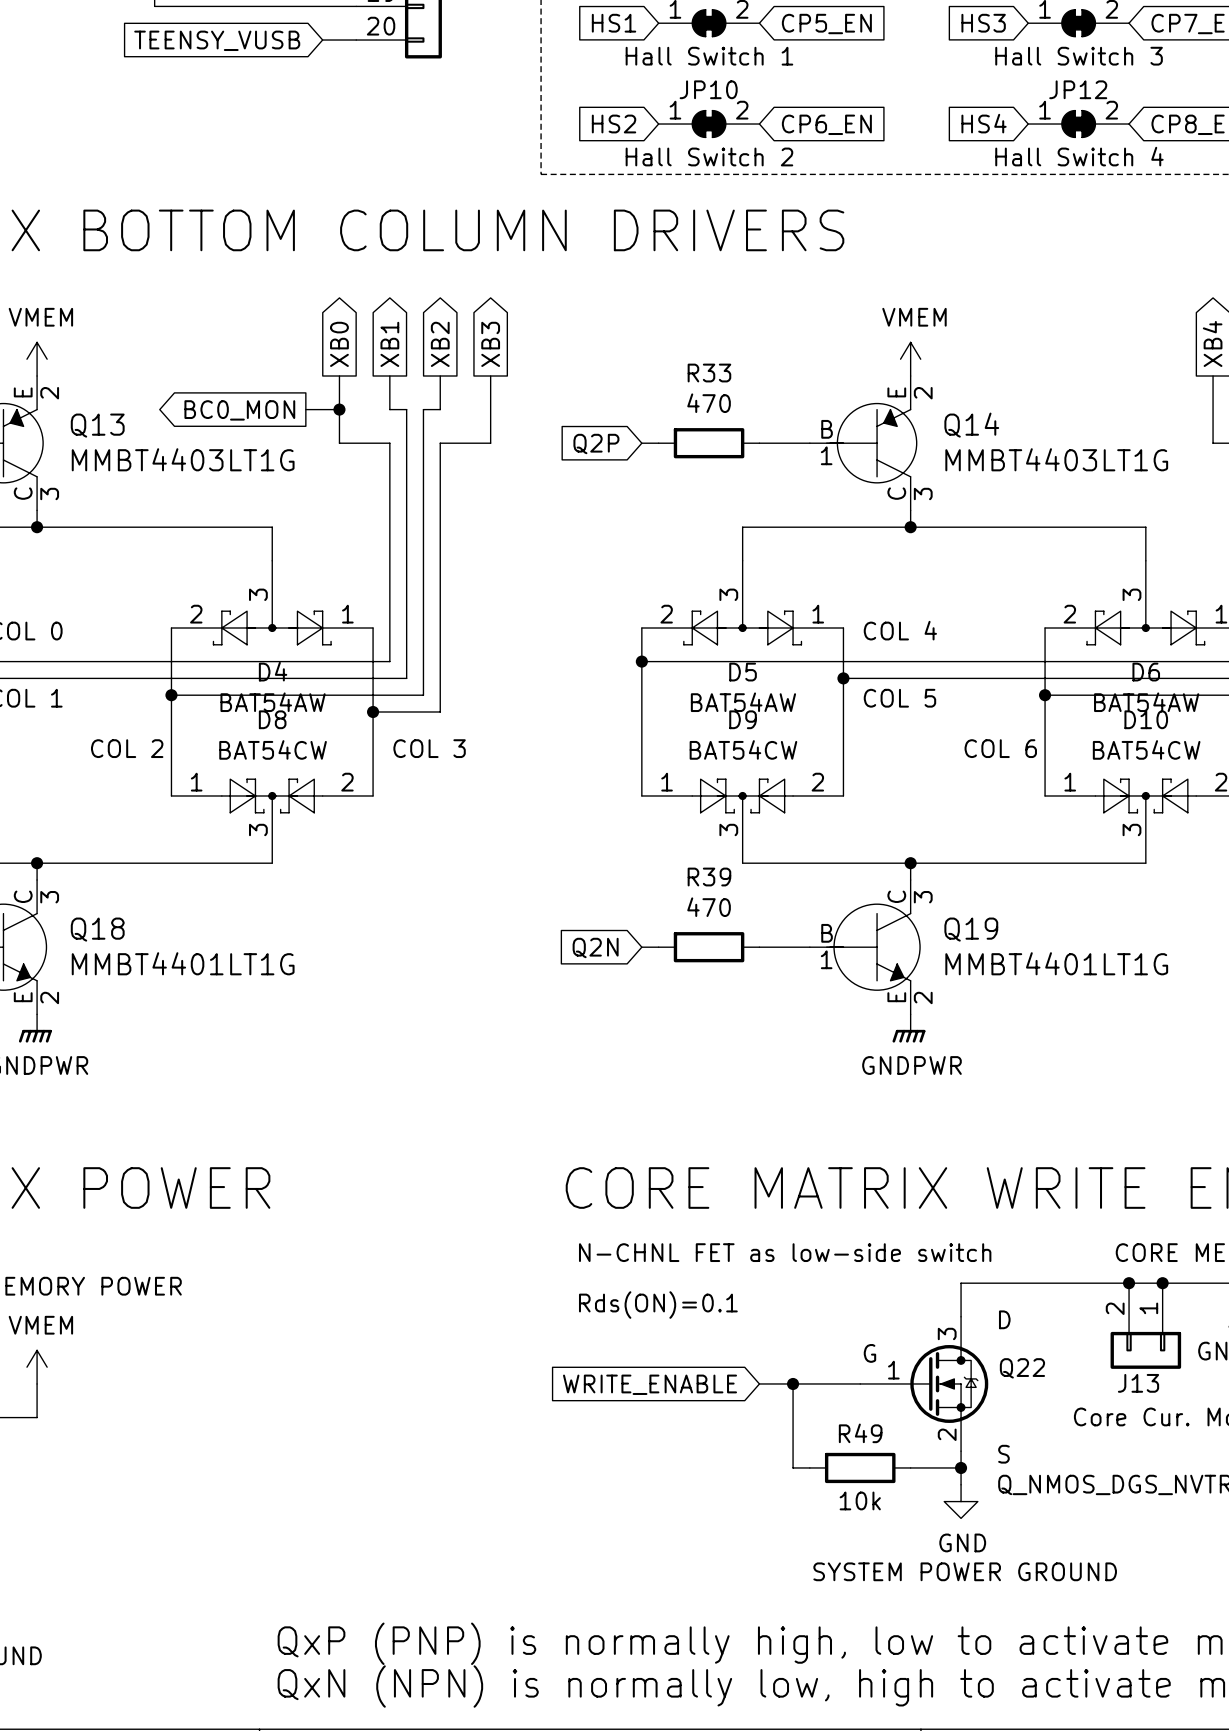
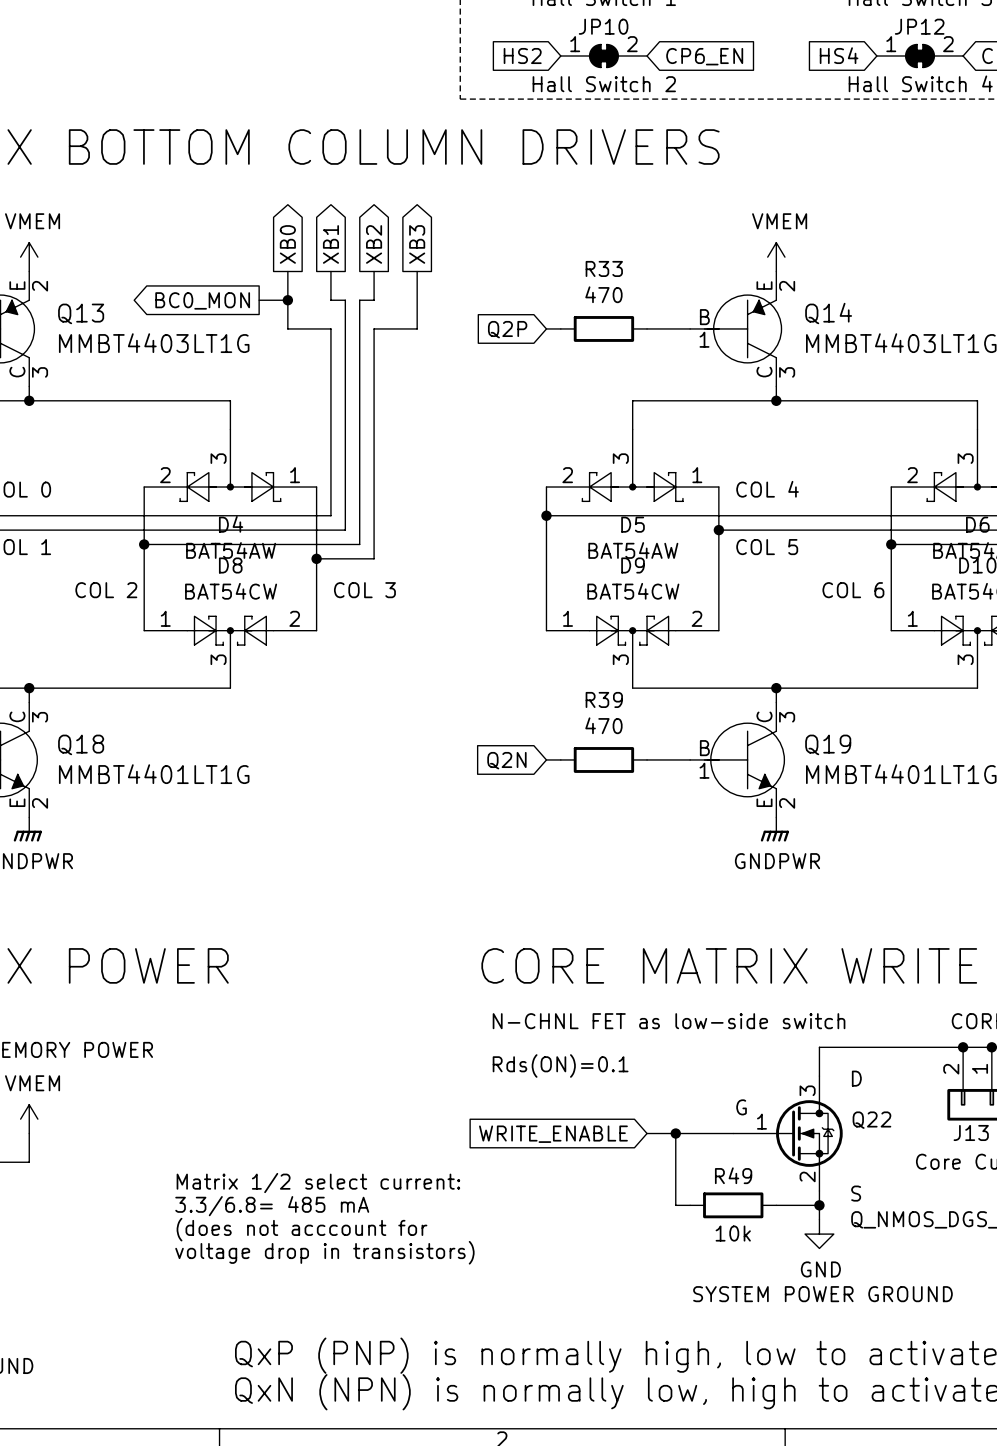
text: none -> Matrix 1/2 select current: (318, 1183)
text: none -> 3.3/6.8= 485 mA (272, 1206)
text: none -> (does not acccount for (301, 1229)
text: none -> voltage drop in transistors) (324, 1252)

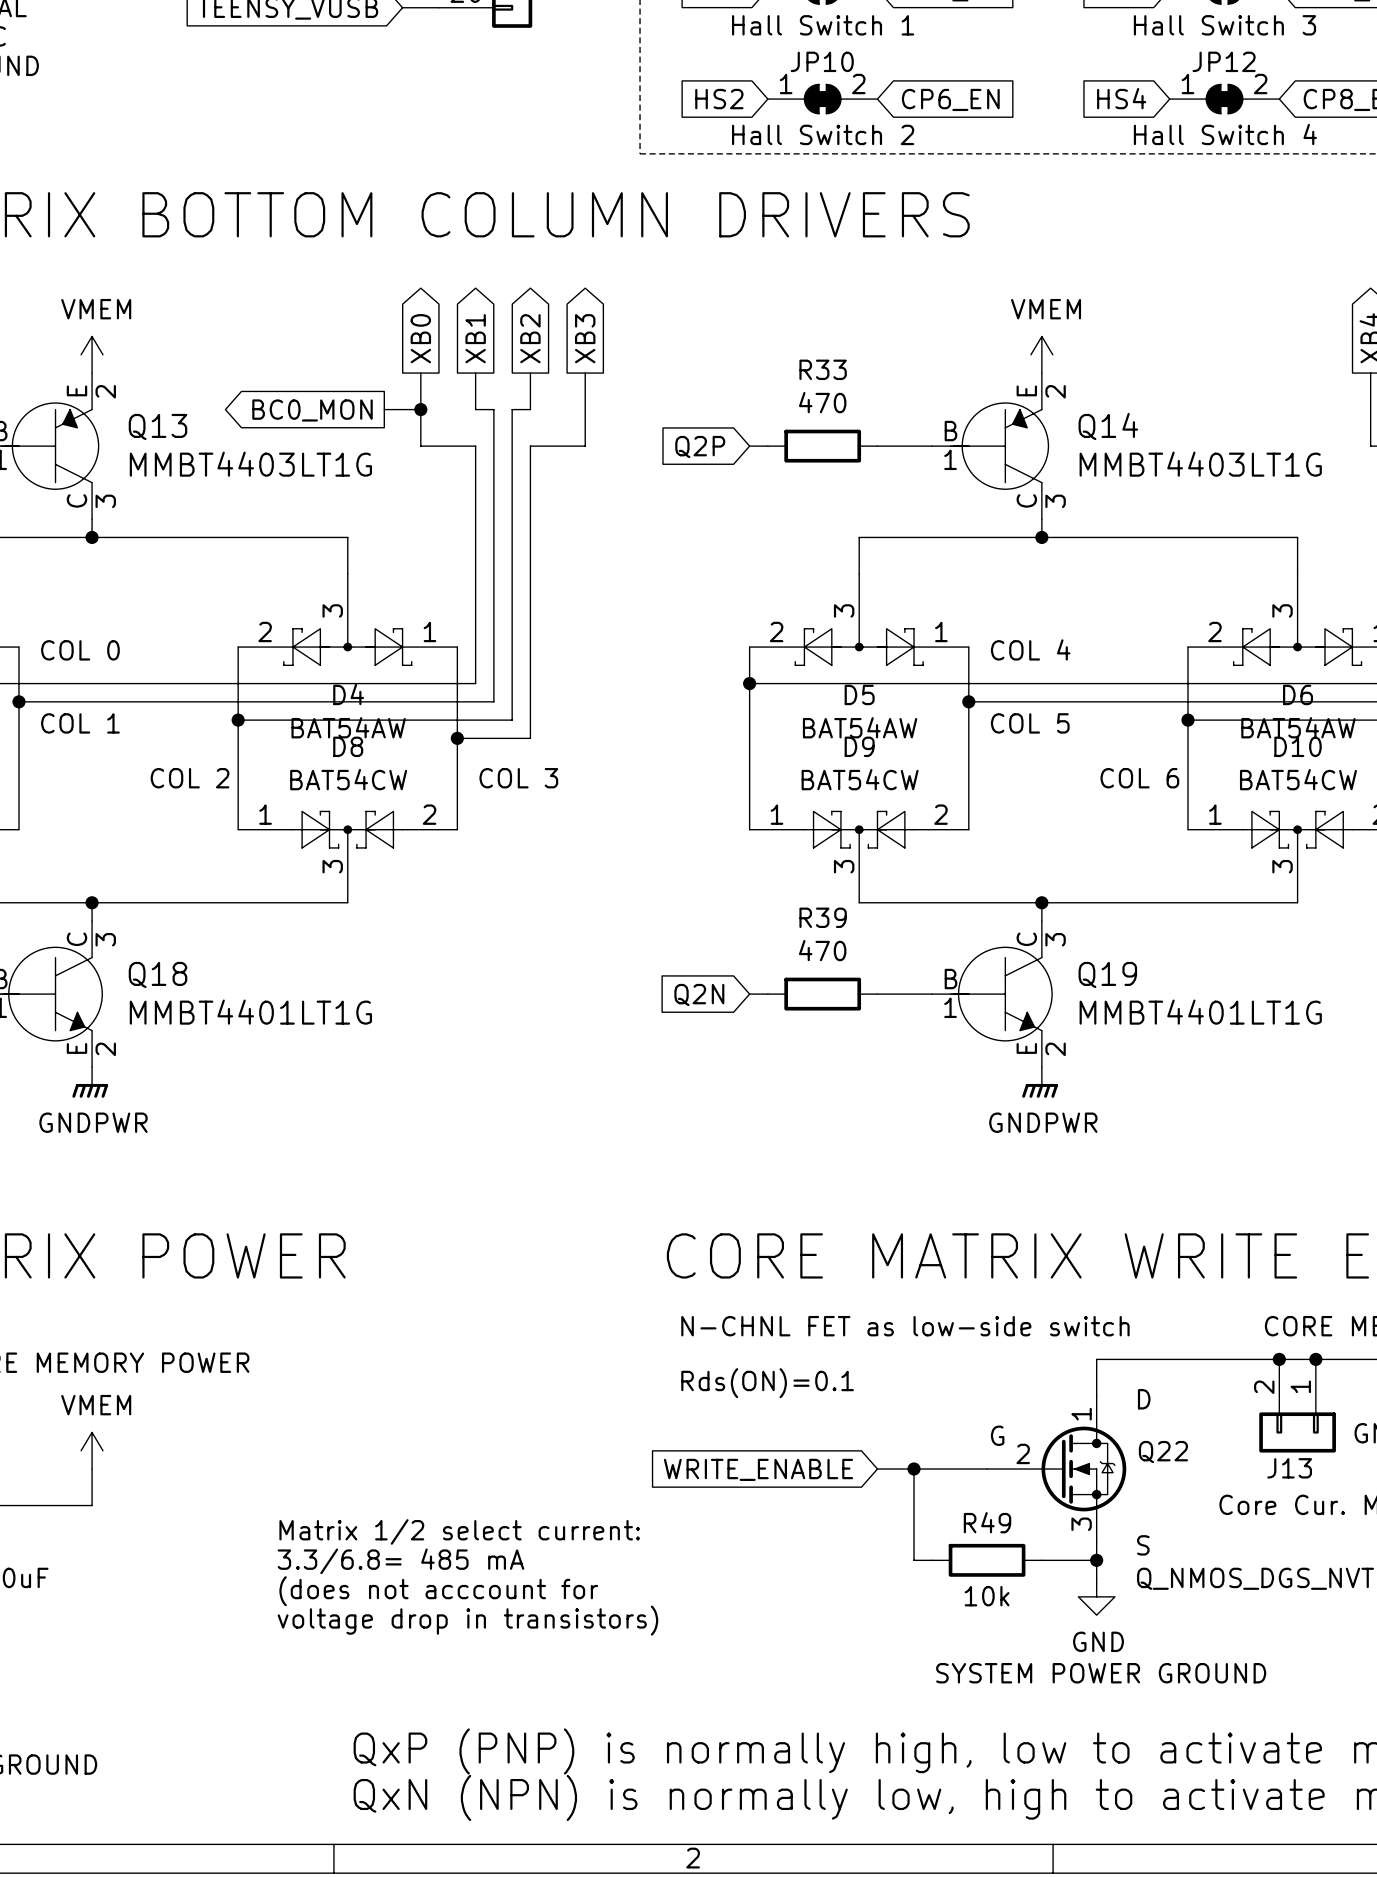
Q22 pin number: 3 (807, 1090) -> 1 (1081, 1414)
Q22 pin number: 1 (761, 1121) -> 2 (1023, 1453)
Q22 pin number: 2 (807, 1176) -> 3 (1081, 1524)

